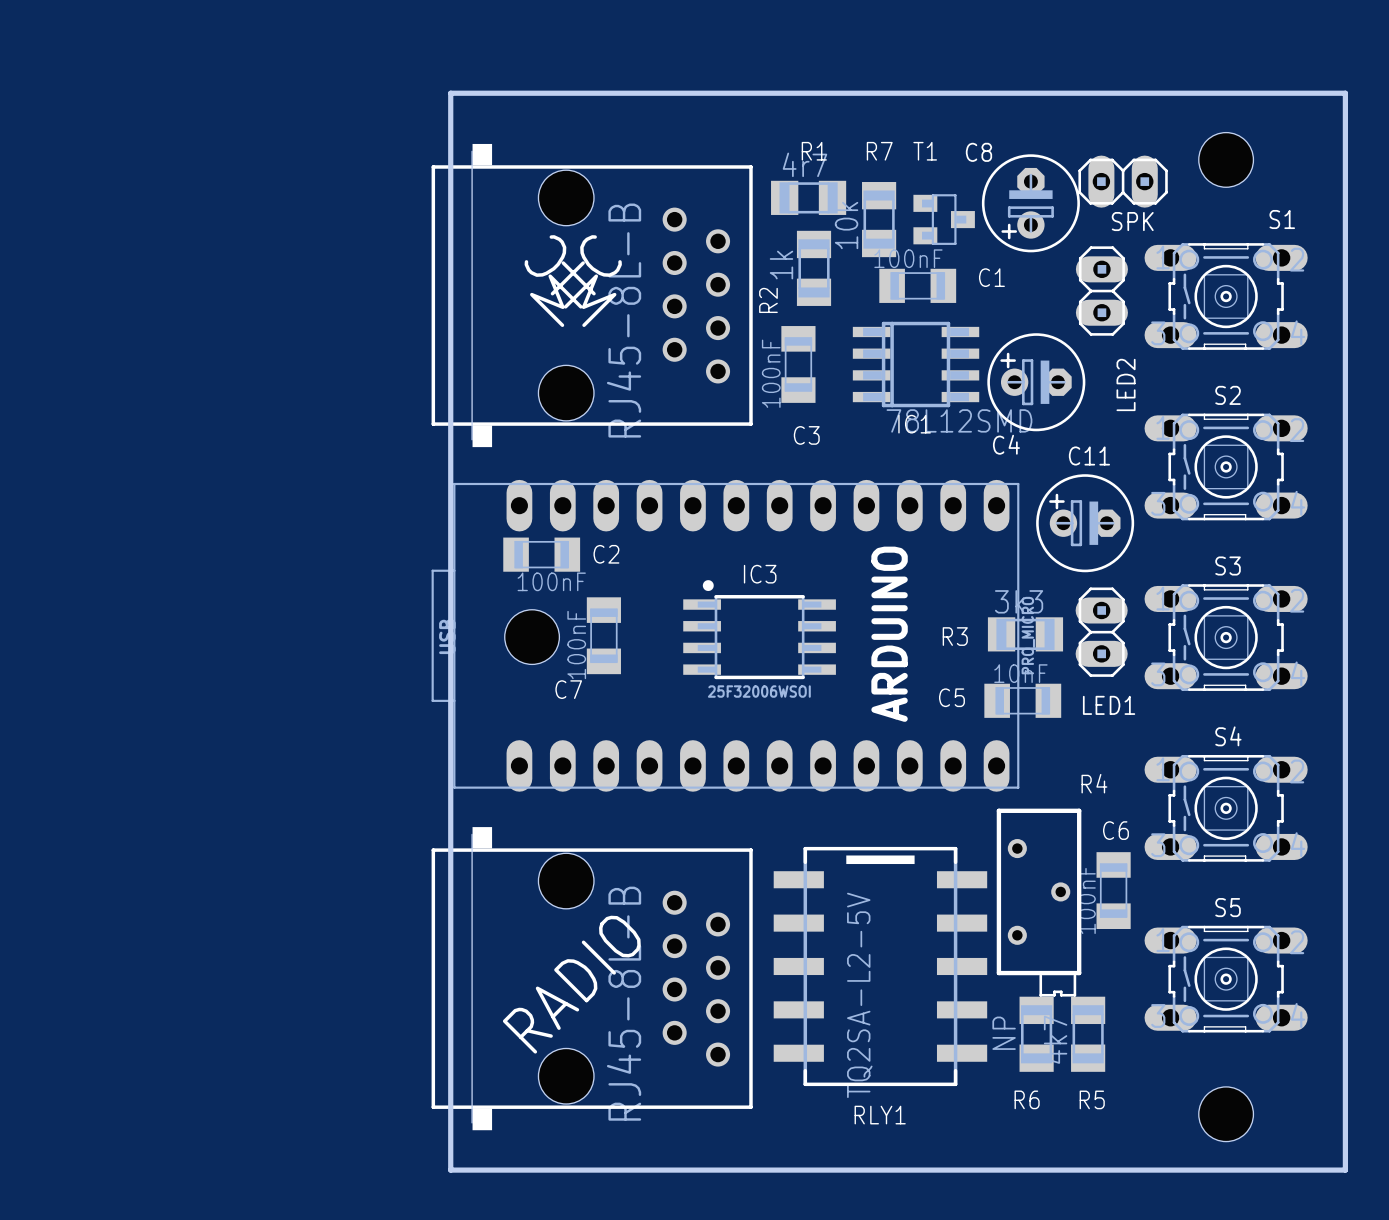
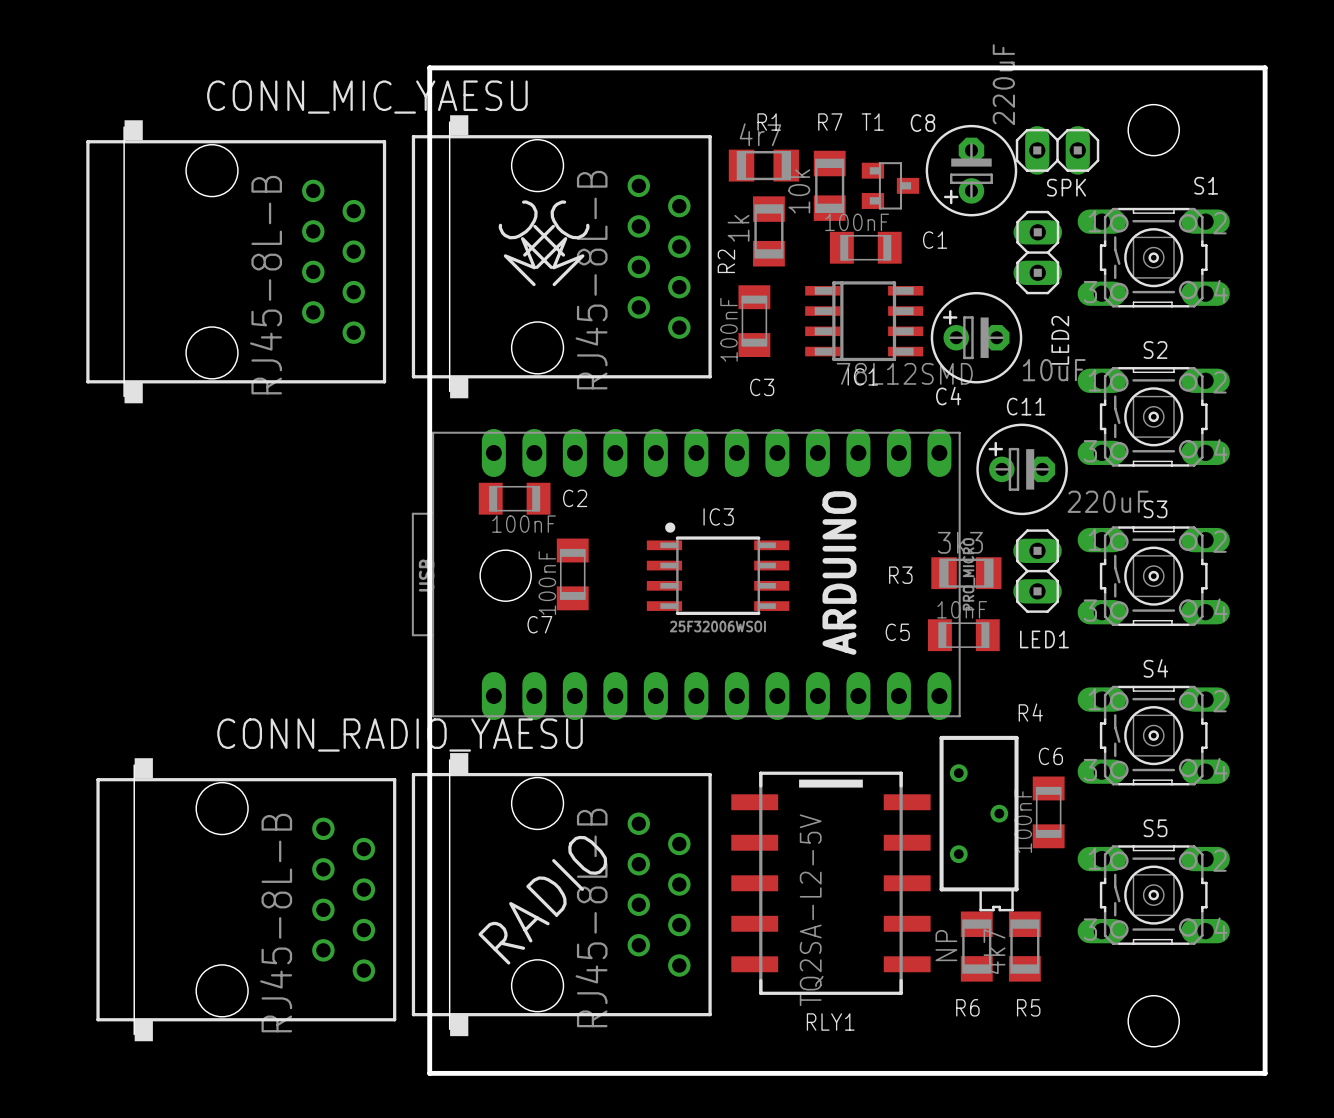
C8 value: none -> 220uF (1003, 84)
CONN_MIC_YAESU: none -> RJ45-8L-B (236, 261)
C4 value: none -> 10uF (1054, 370)
C11 value: none -> 220uF (1108, 501)
CONN_RADIO_YAESU: none -> RJ45-8L-B (246, 899)

